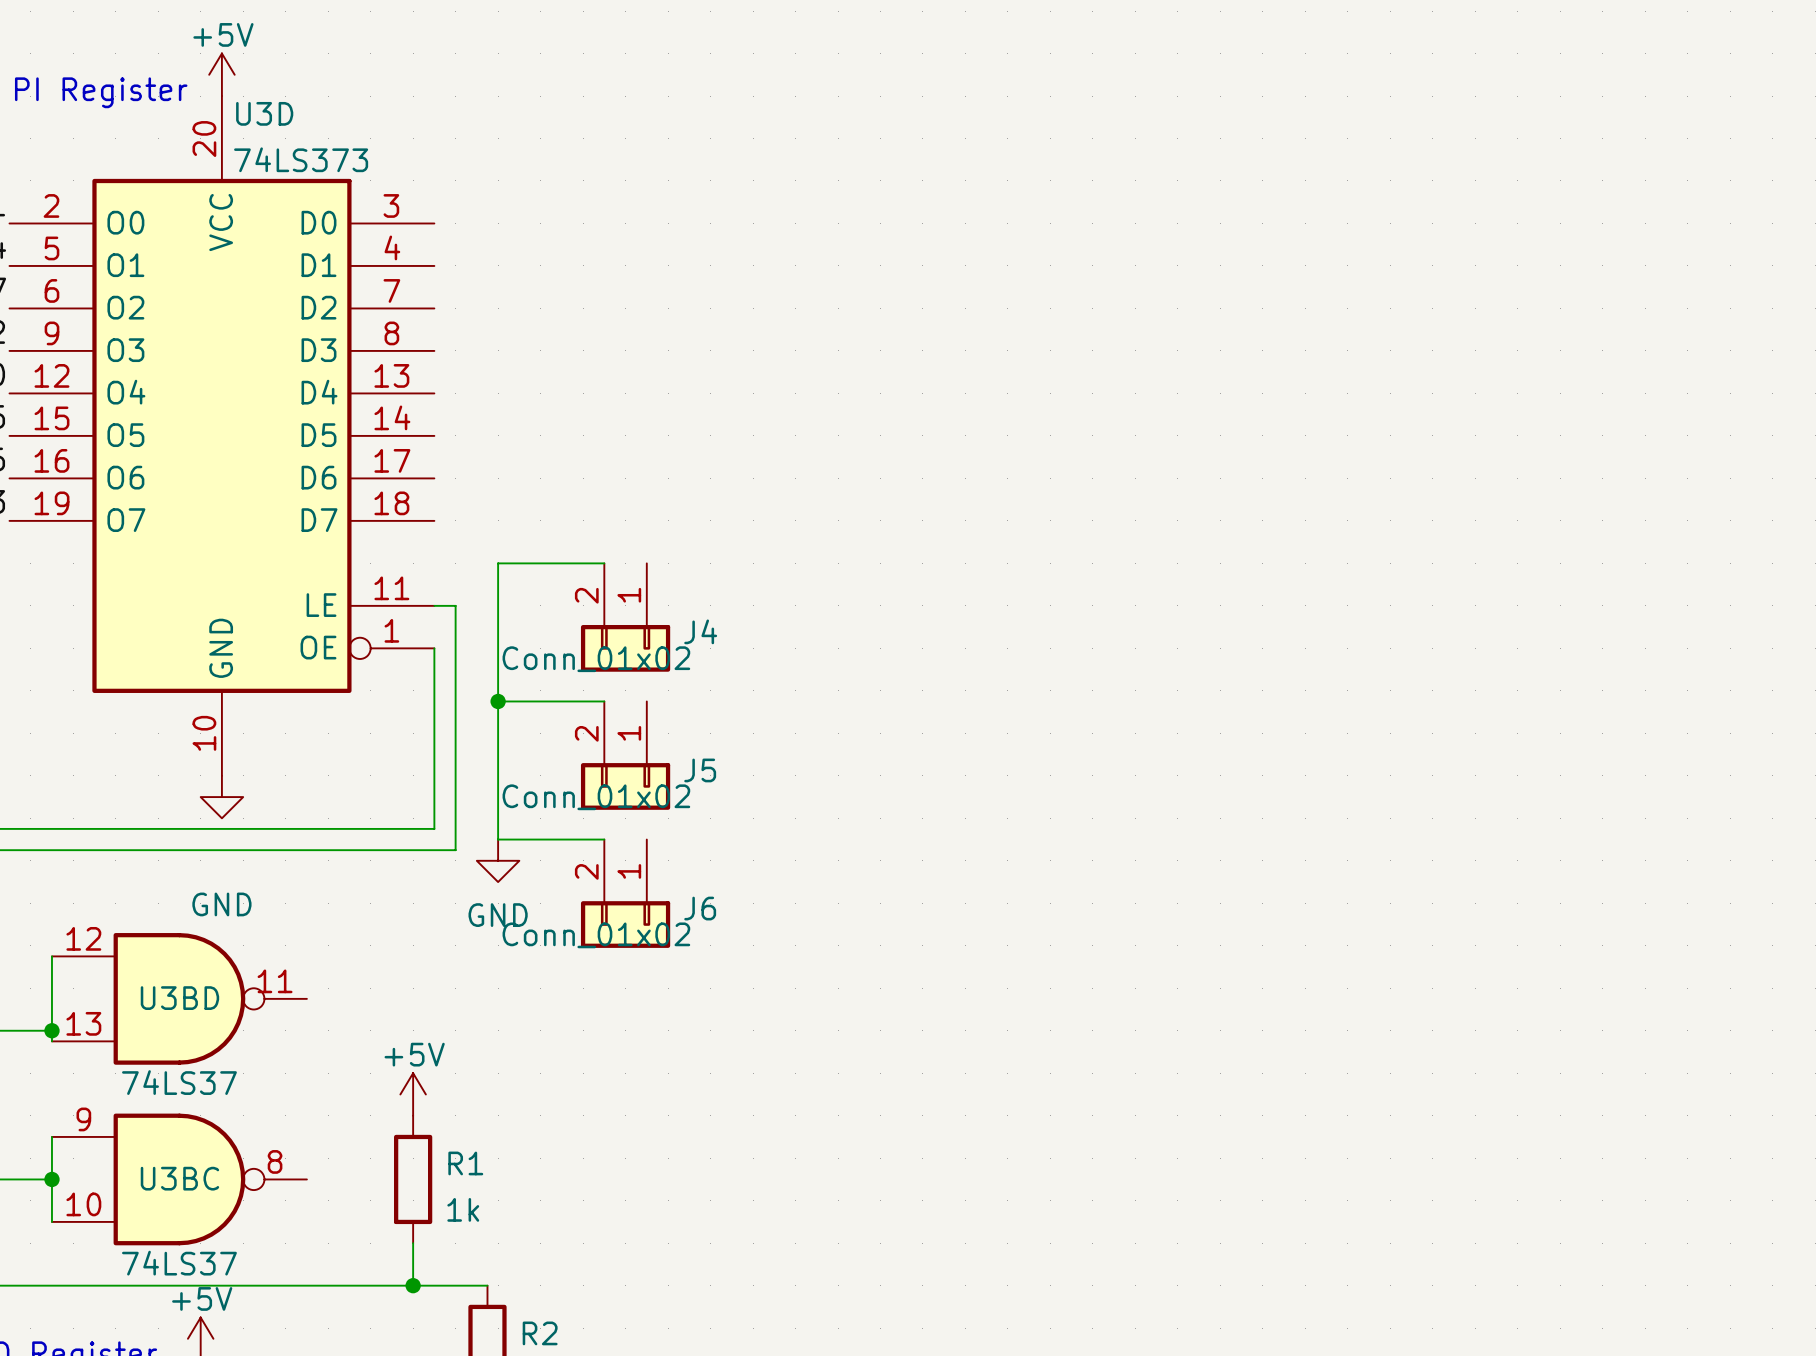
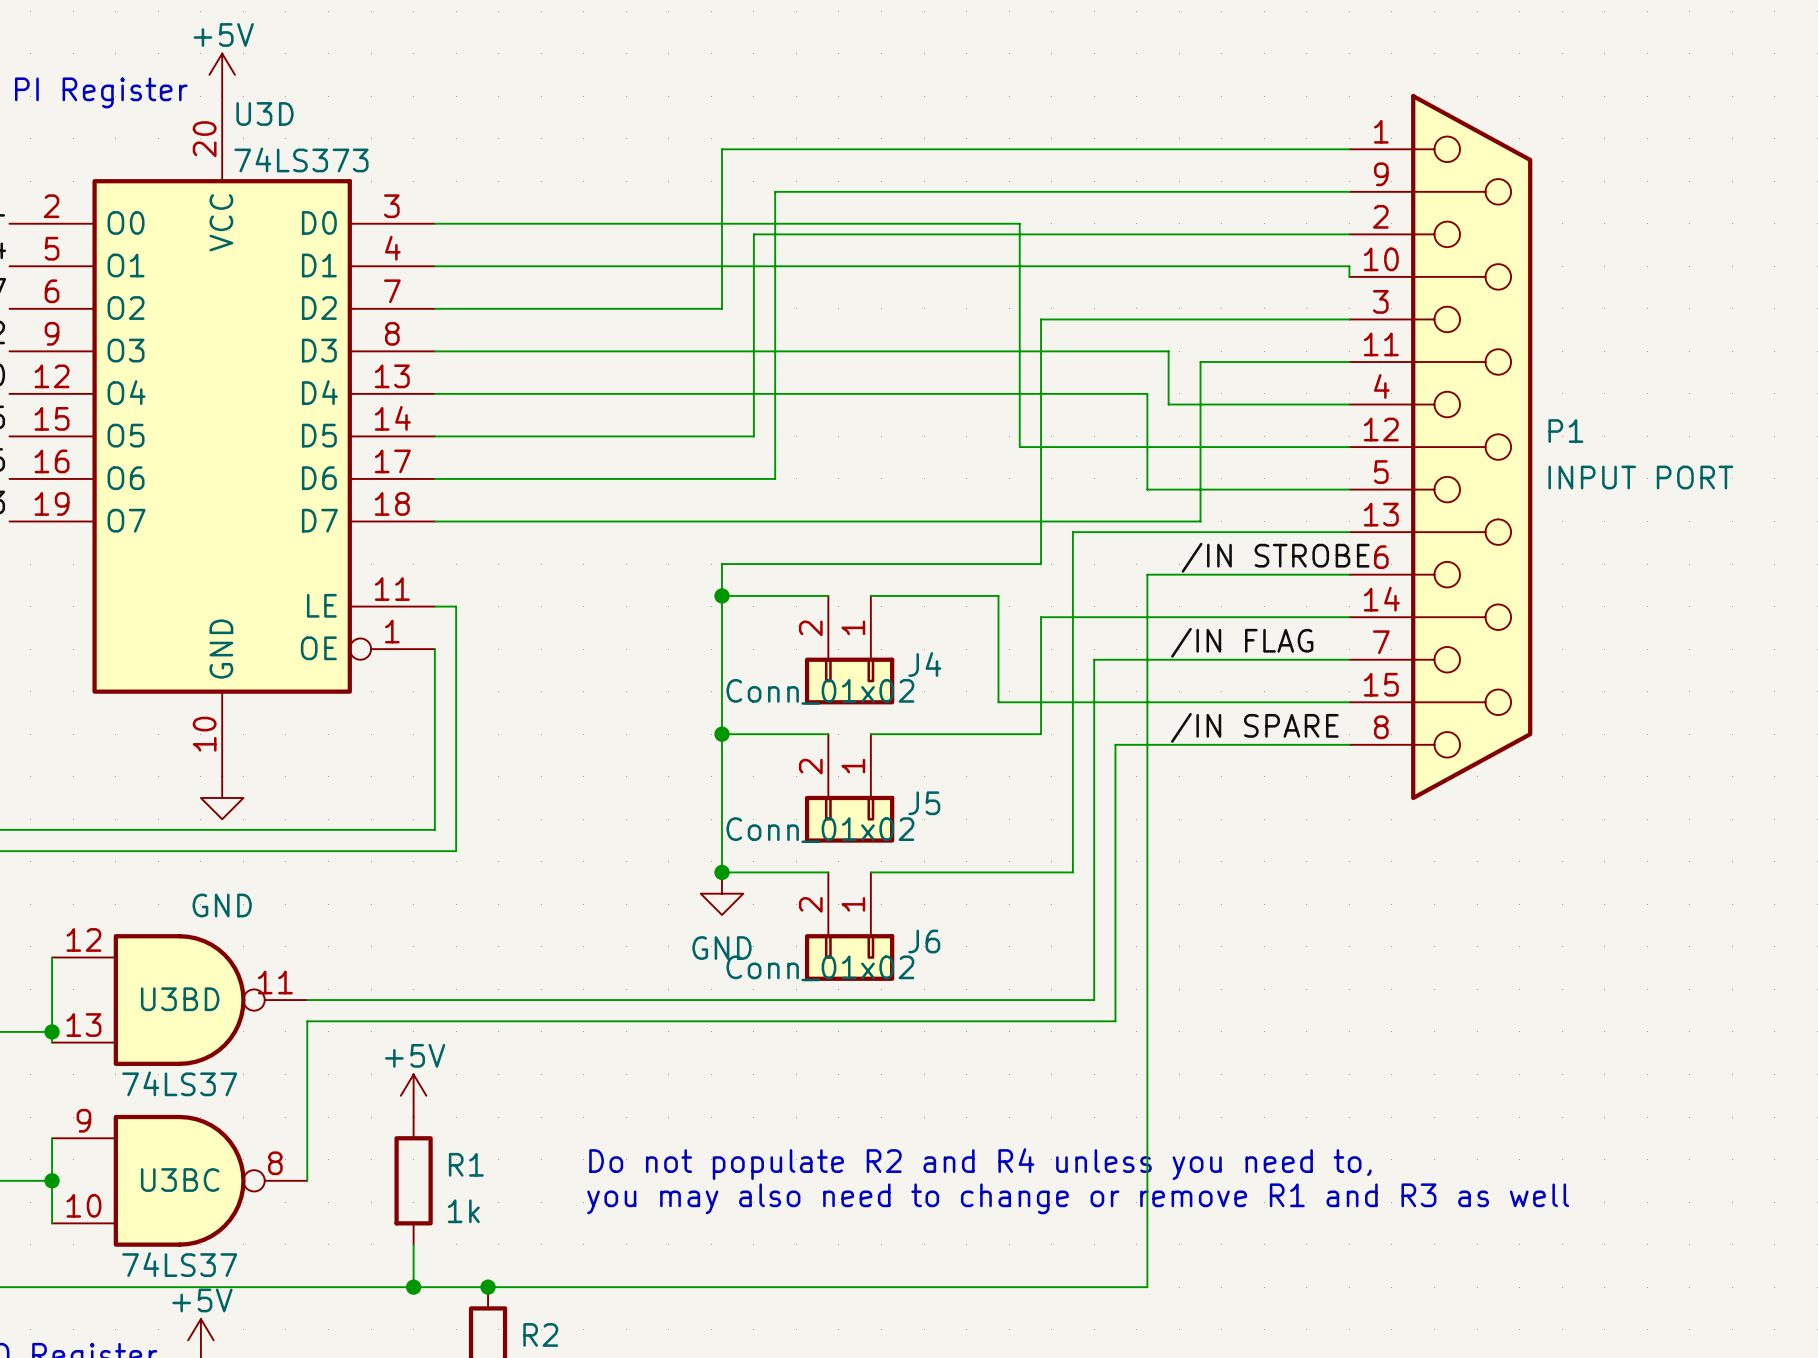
wire: none -> (1349, 149) (722, 149) (722, 308) (434, 308)
wire: none -> (1349, 191) (775, 191) (775, 478) (434, 478)
wire: none -> (434, 223) (1019, 223) (1019, 447) (1349, 447)
wire: none -> (1349, 234) (753, 234) (753, 436) (434, 436)
wire: none -> (434, 266) (1349, 266) (1349, 276)
wire: none -> (1349, 319) (1041, 319) (1041, 564) (722, 564) (722, 872) (828, 872)
wire: none -> (434, 351) (1168, 351) (1168, 404) (1349, 404)
wire: none -> (1349, 361) (1200, 361) (1200, 521) (434, 521)
wire: none -> (434, 393) (1147, 393) (1147, 489) (1349, 489)
P1: none -> INPUT PORT (1440, 447)
wire: none -> (1349, 532) (1072, 532) (1072, 872) (870, 872)
label: none -> /IN STROBE (1275, 557)
wire: (604, 563) (498, 563) (498, 839) (604, 839) -> none
wire: none -> (1349, 574) (1147, 574) (1147, 1287) (488, 1287)
wire: none -> (722, 595) (828, 595)
junction: none -> (722, 595)
wire: none -> (870, 595) (998, 595) (998, 702) (1349, 702)
wire: none -> (1349, 617) (1041, 617) (1041, 734) (870, 734)
J4 position: (625, 617) -> (849, 650)
label: none -> /IN FLAG (1242, 642)
wire: none -> (1349, 659) (1094, 659) (1094, 1000) (307, 1000)
wire: (498, 701) (604, 701) -> (722, 734) (828, 734)
junction: (498, 701) -> none
label: none -> /IN SPARE (1254, 727)
junction: none -> (722, 734)
wire: none -> (1349, 744) (1115, 744) (1115, 1021) (307, 1021) (307, 1180)
J5 position: (625, 755) -> (849, 788)
power symbol position: GND (498, 860) -> GND (722, 893)
junction: none -> (722, 872)
J6 position: (625, 893) -> (849, 926)
text: none -> Do not populate R2 and R4 unless you need to, (980, 1164)
text: none -> you may also need to change or remove R1 and R3 as well (1078, 1198)
junction: none -> (488, 1287)

